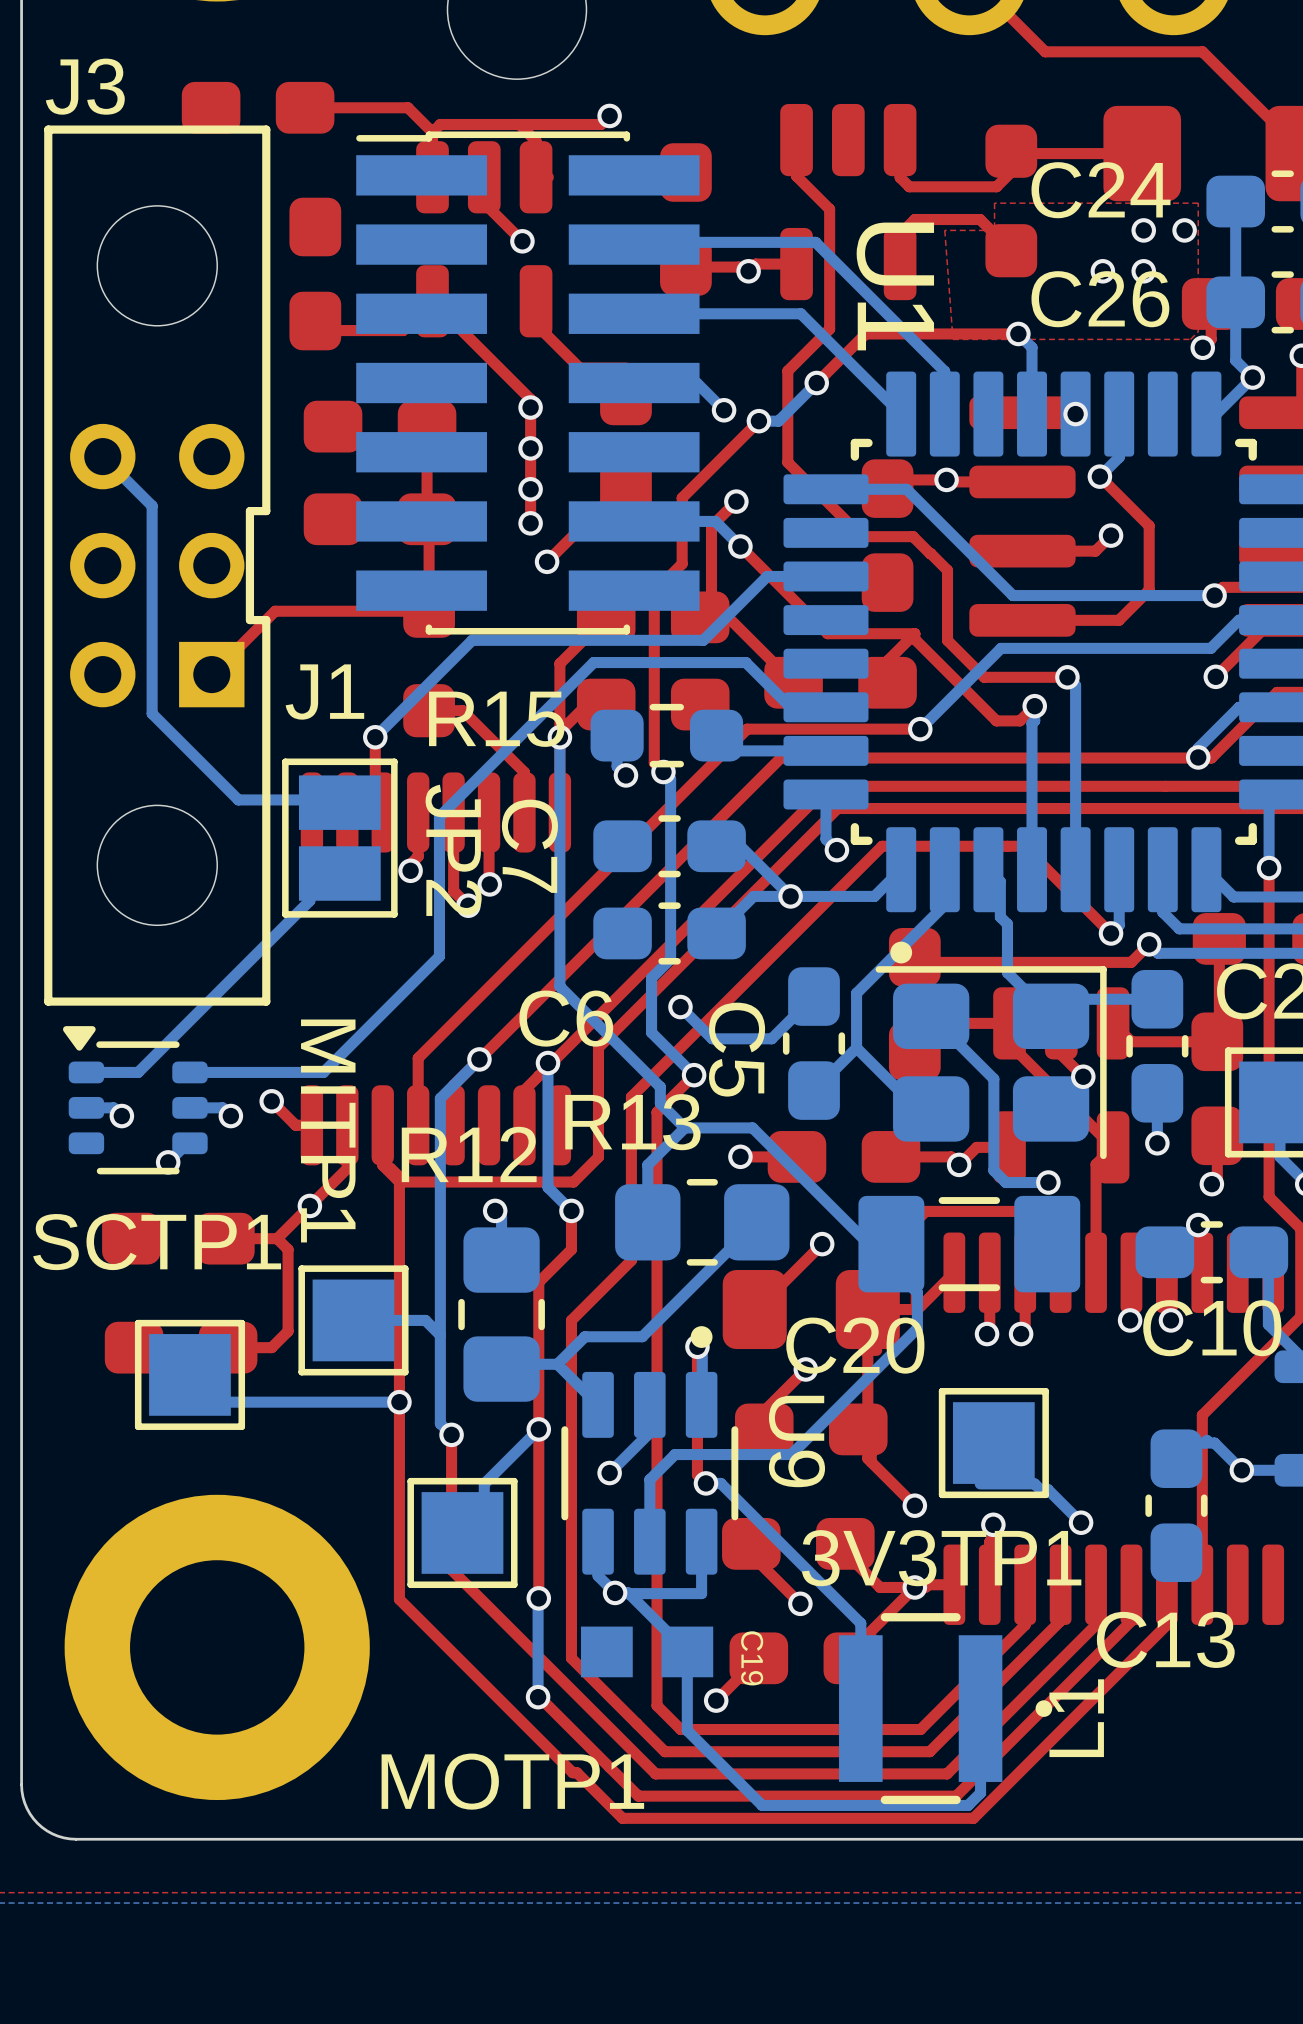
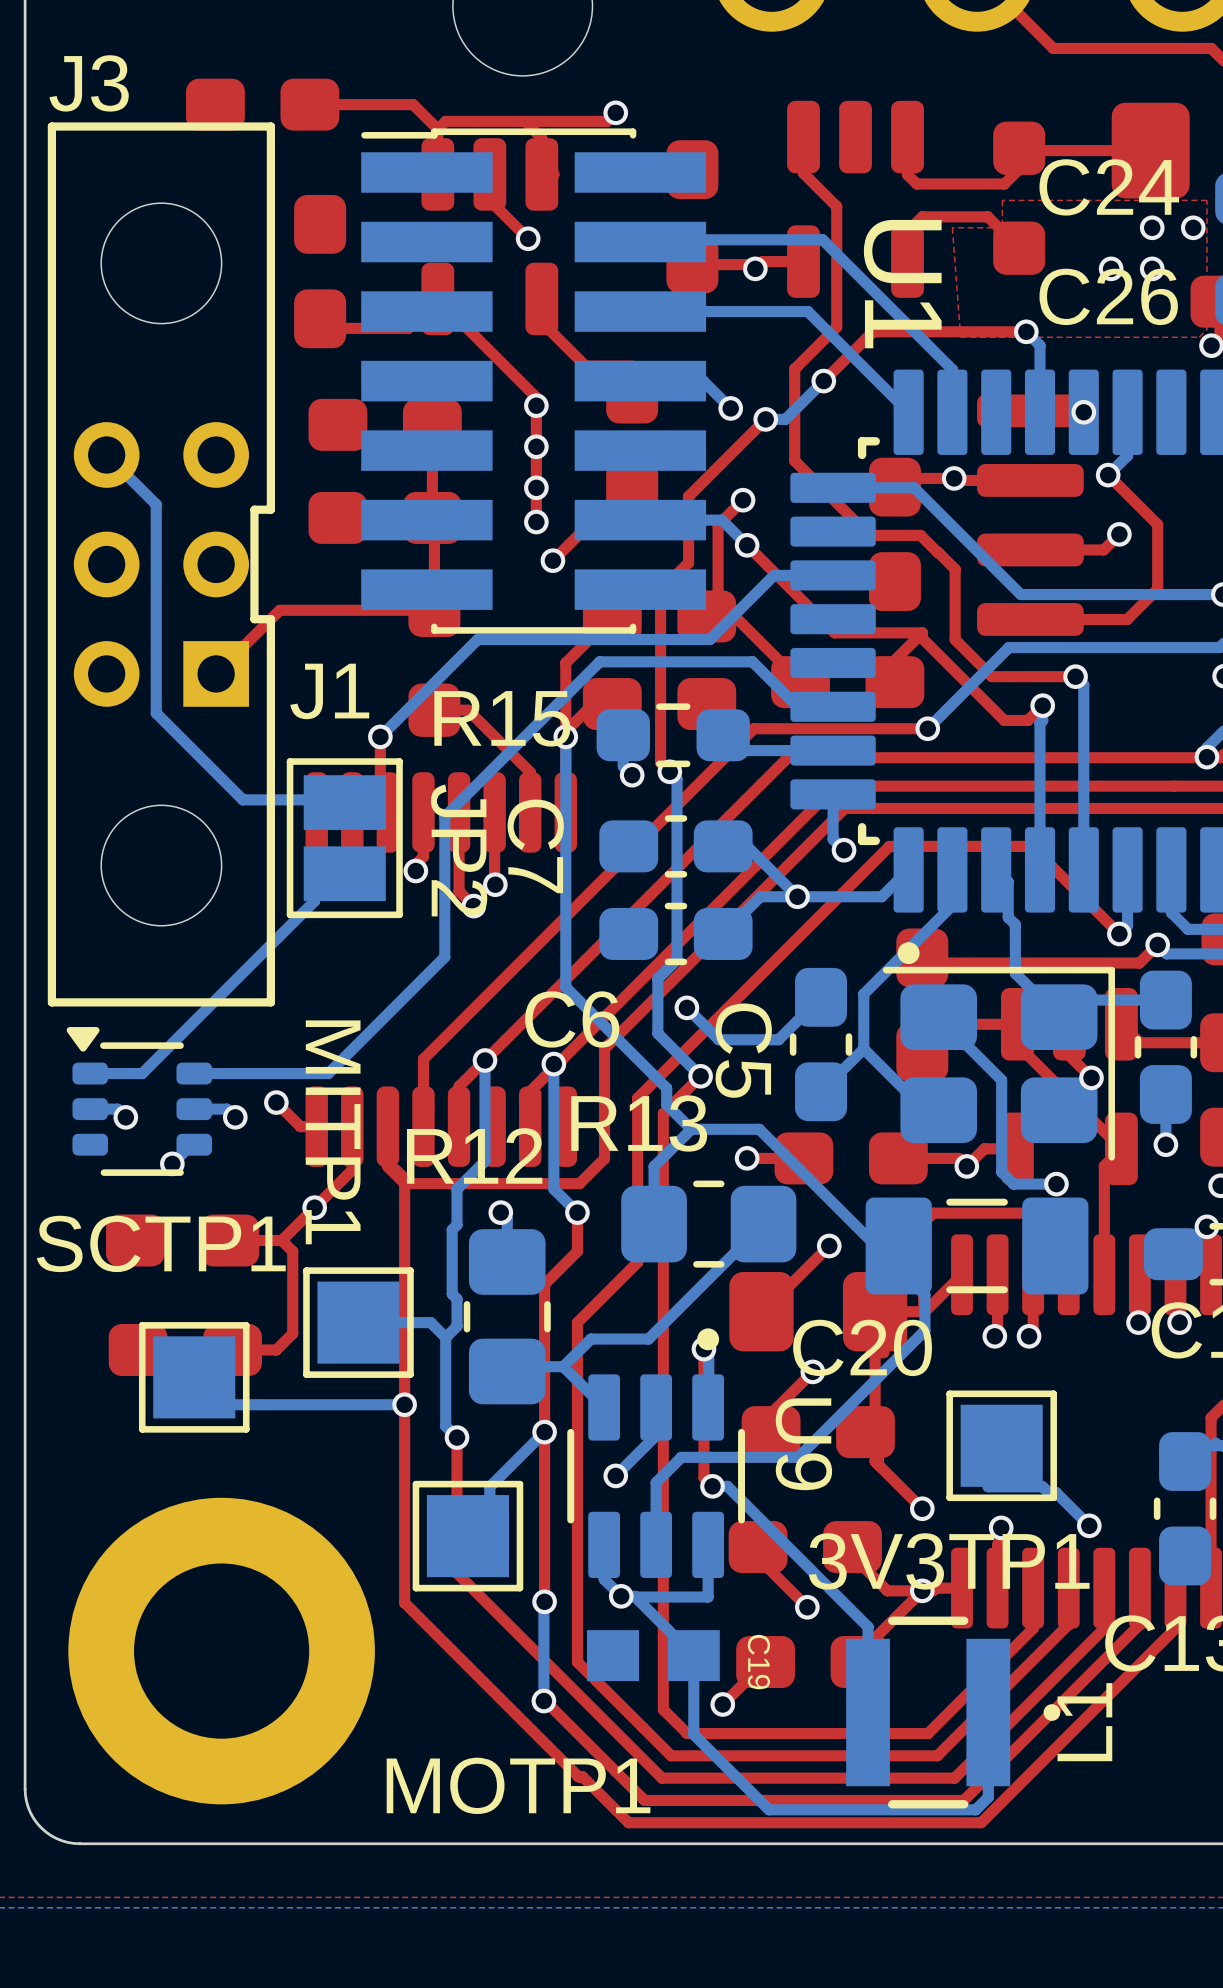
bottom track: (479, 1059) (440, 1098) (440, 1335) -> (484, 1060) (484, 1161) (457, 1189) (457, 1225) (452, 1229) (452, 1294) (457, 1298) (457, 1326) (445, 1337)

